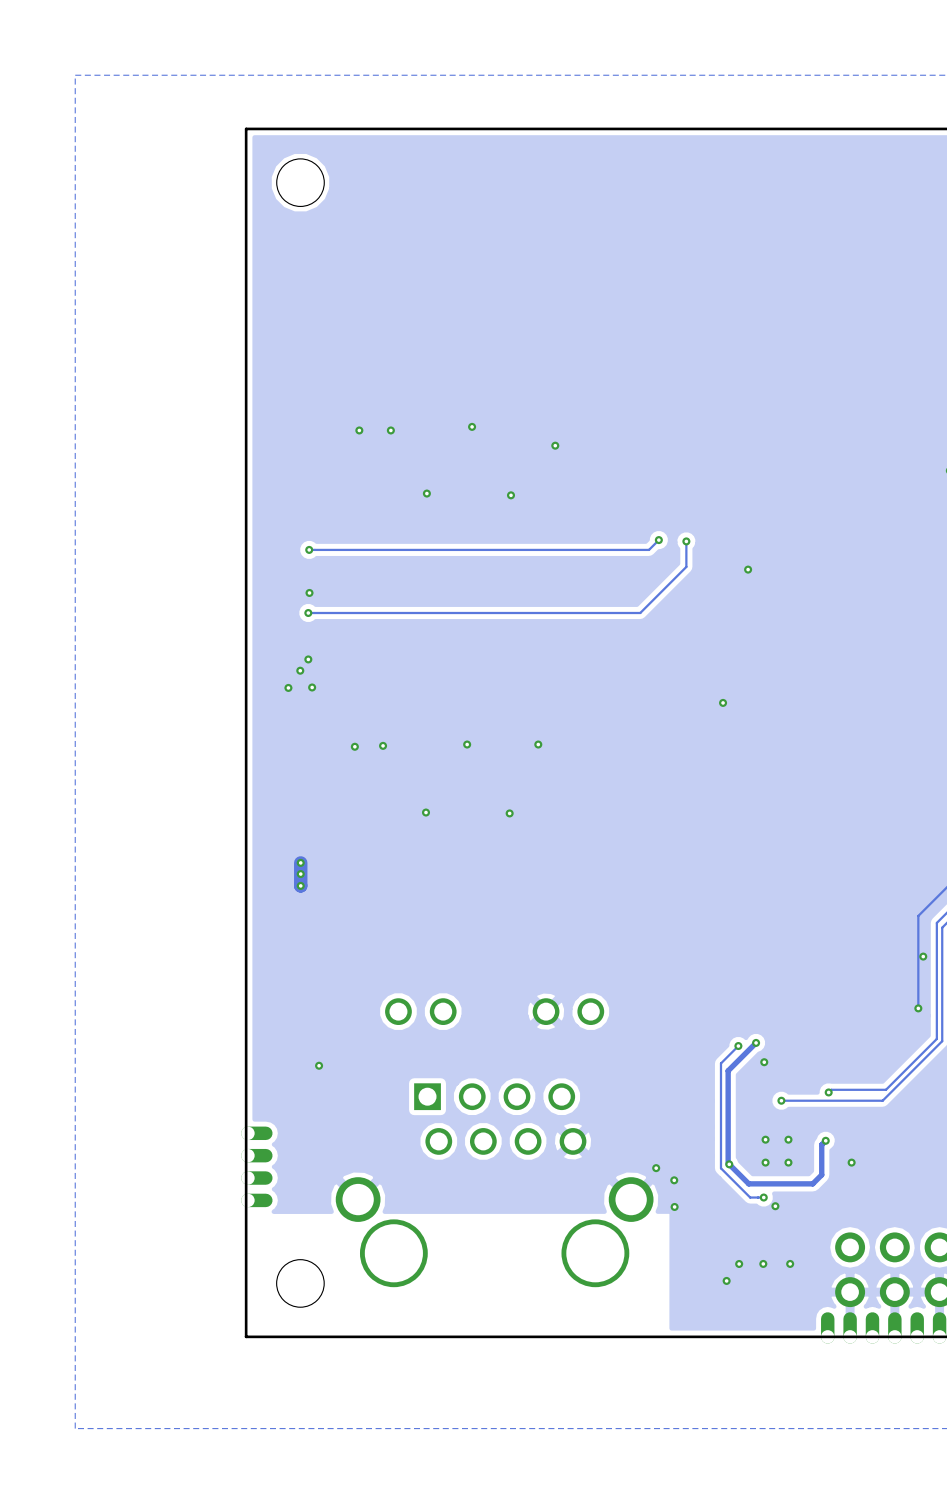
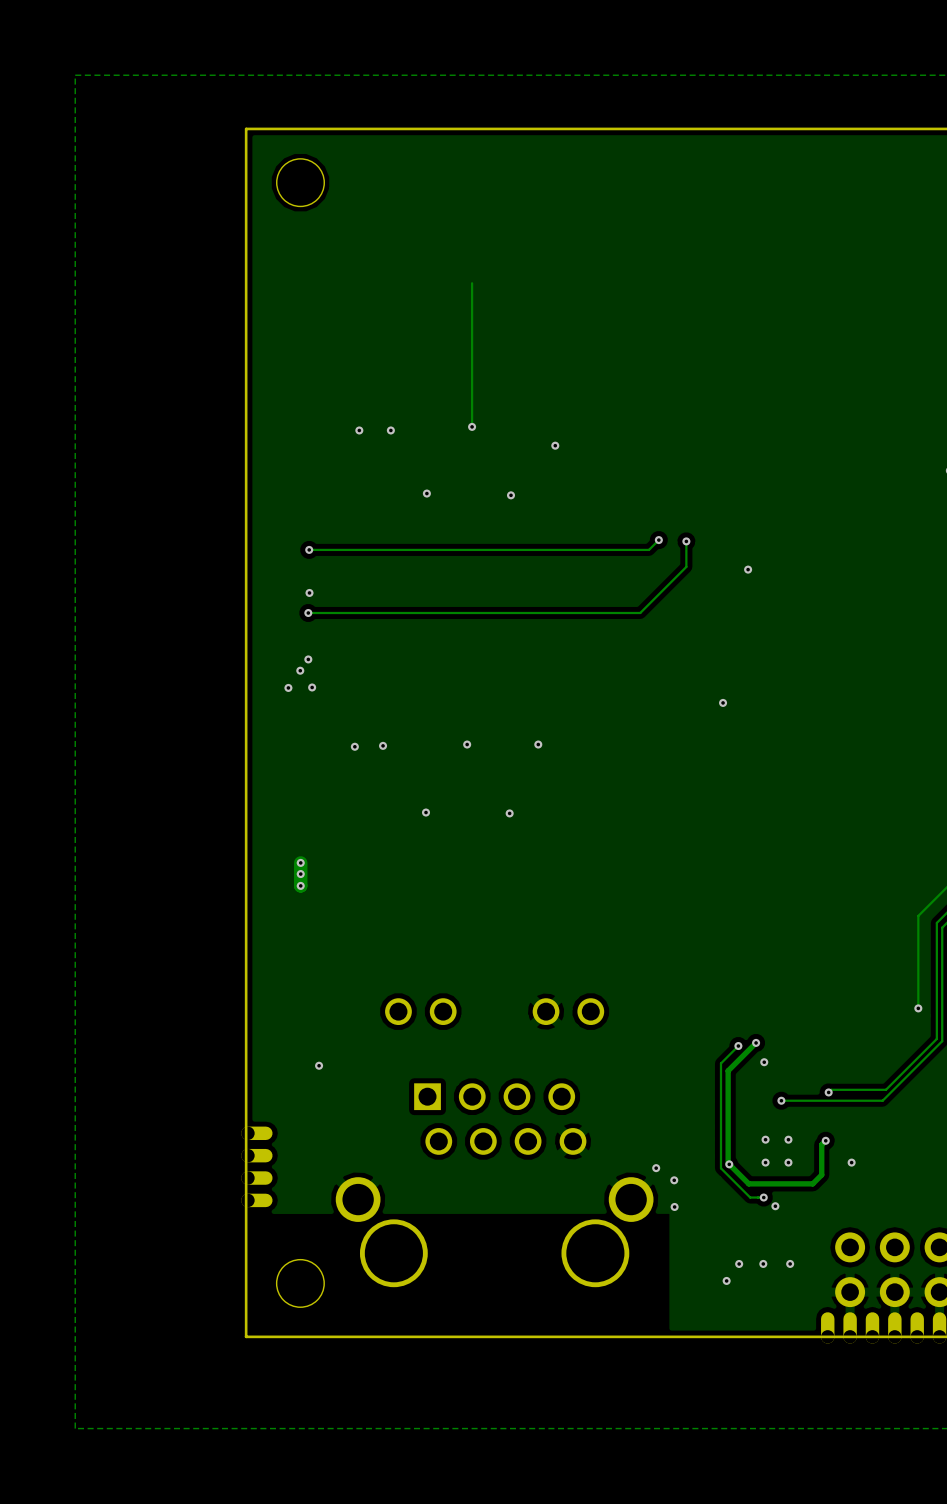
track: none -> (472, 283) (472, 426)
via: (923, 956) -> none

